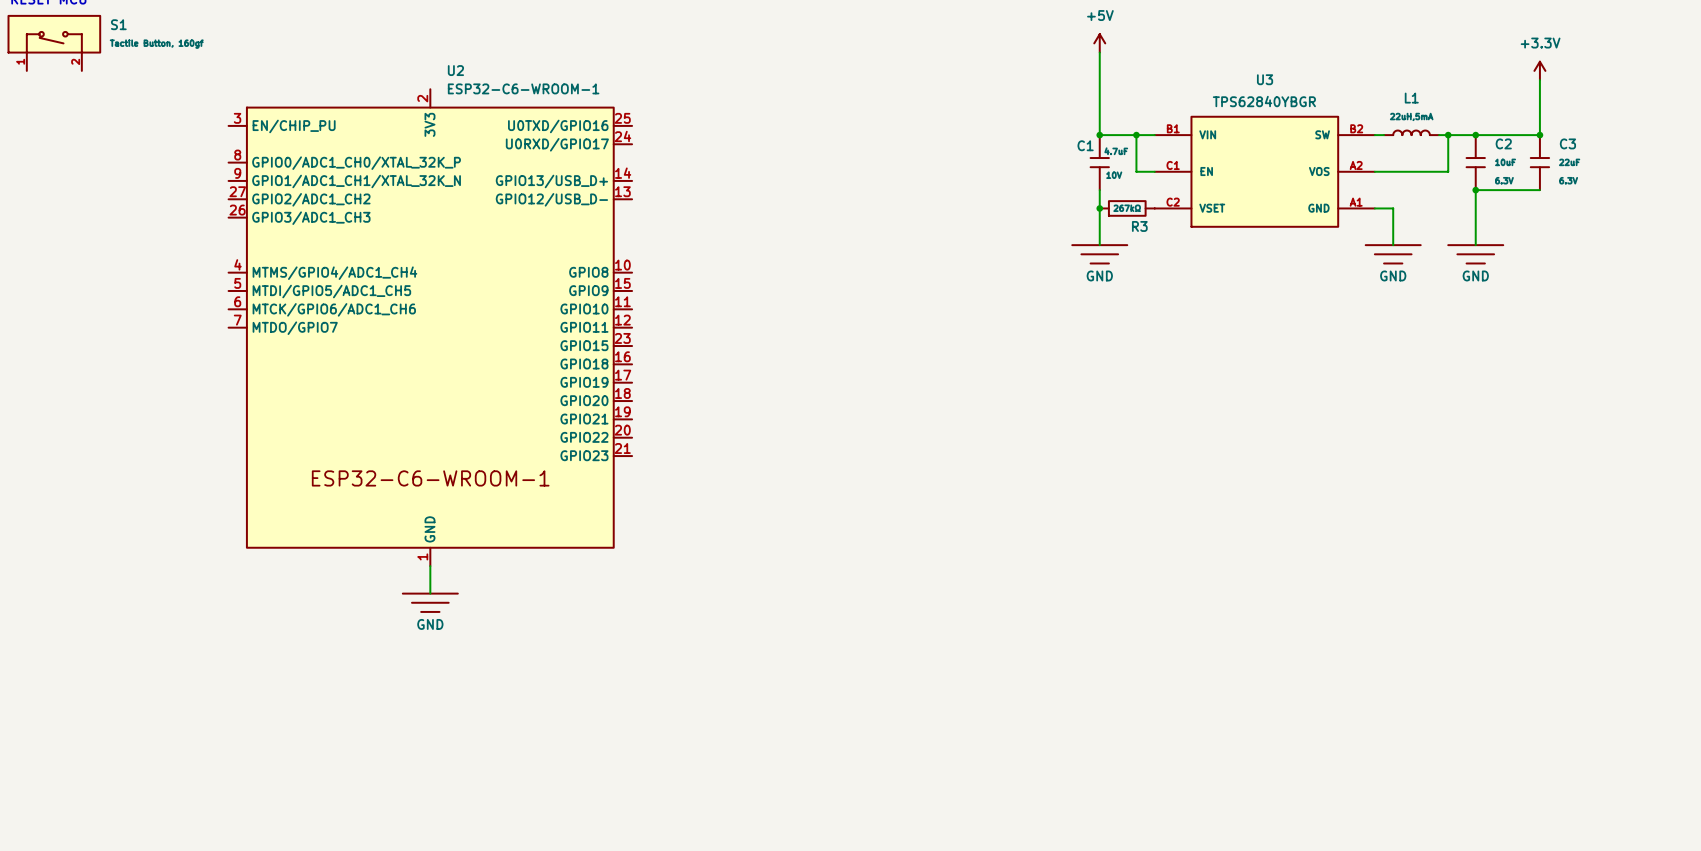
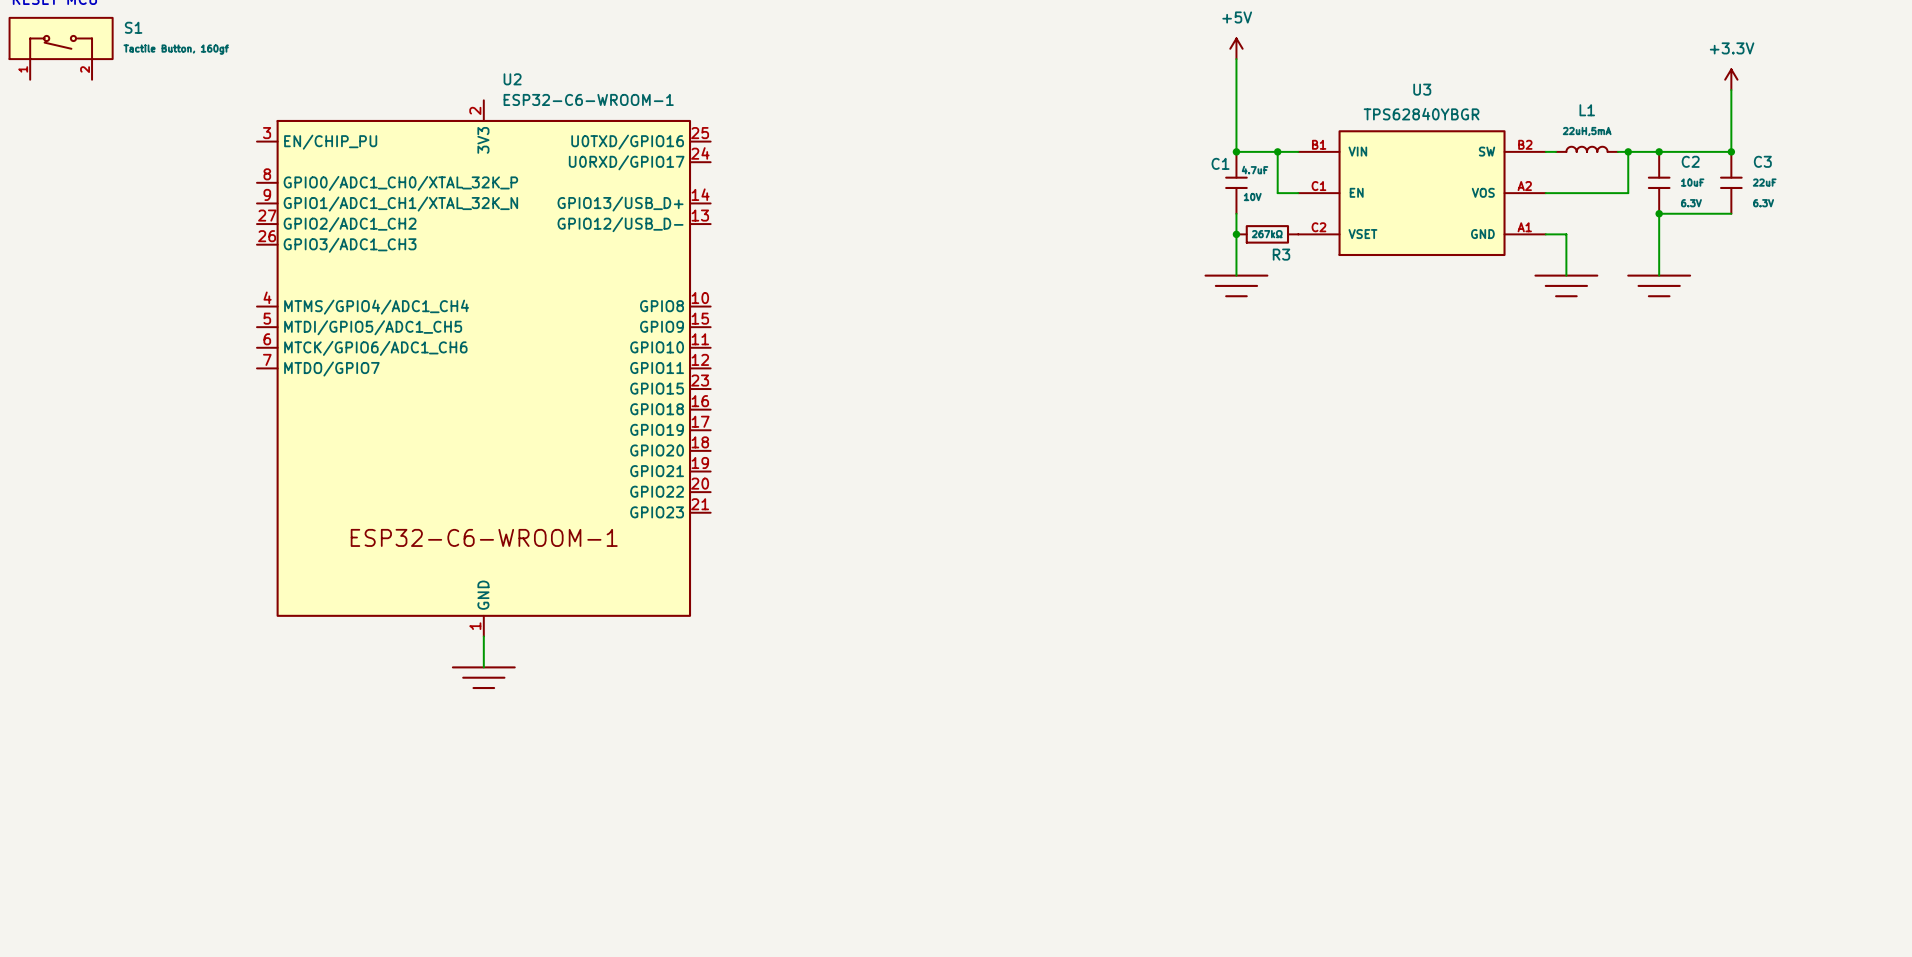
power symbol text: GND (1099, 275) -> none
power symbol text: GND (1393, 275) -> none
power symbol text: GND (1475, 275) -> none
power symbol text: GND (430, 624) -> none

